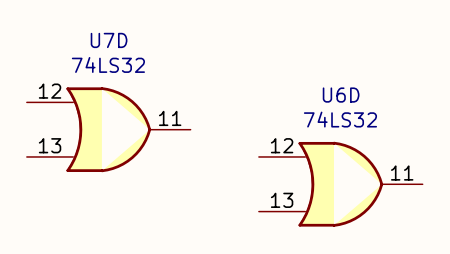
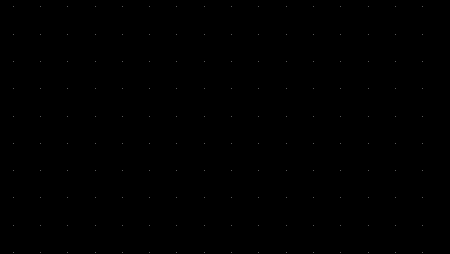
U7D: 74LS32 (108, 129) -> none
U6D: 74LS32 (340, 184) -> none

